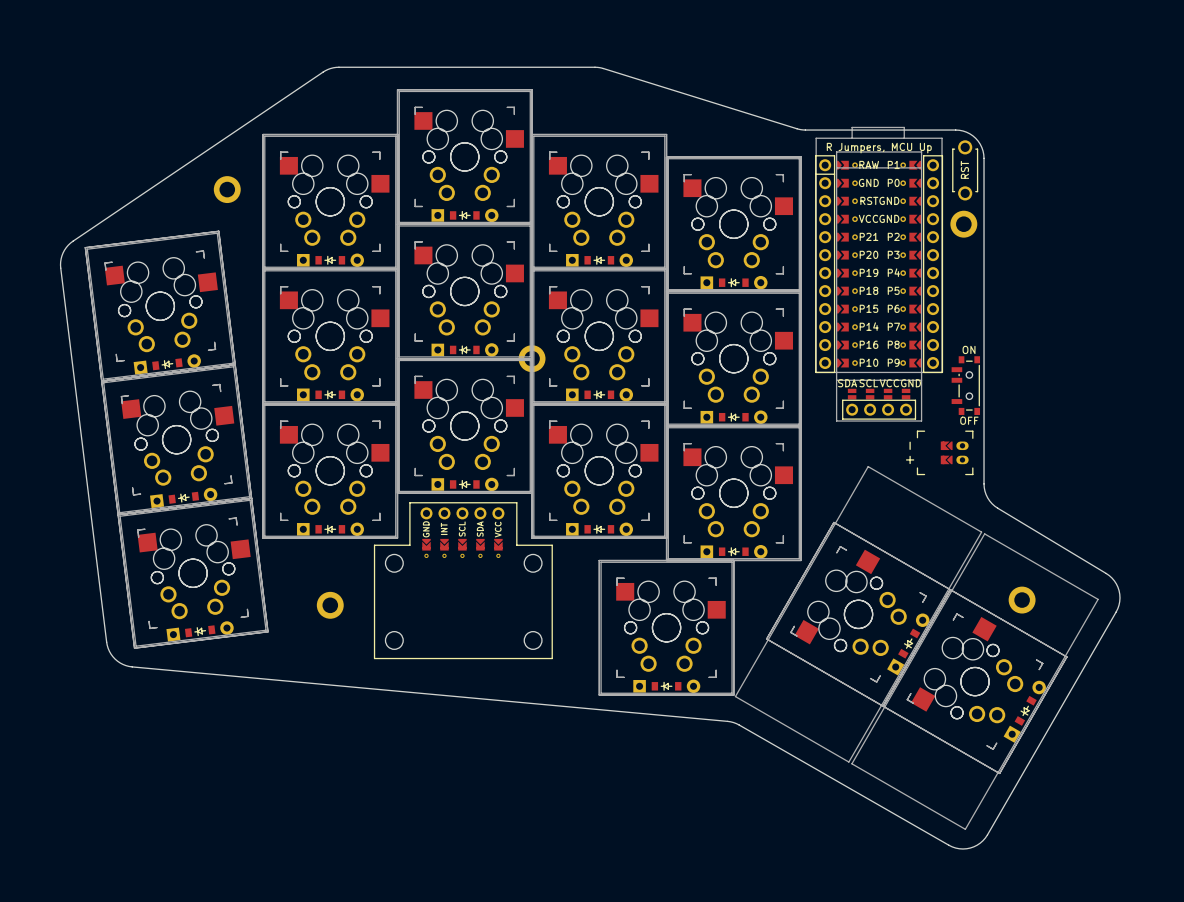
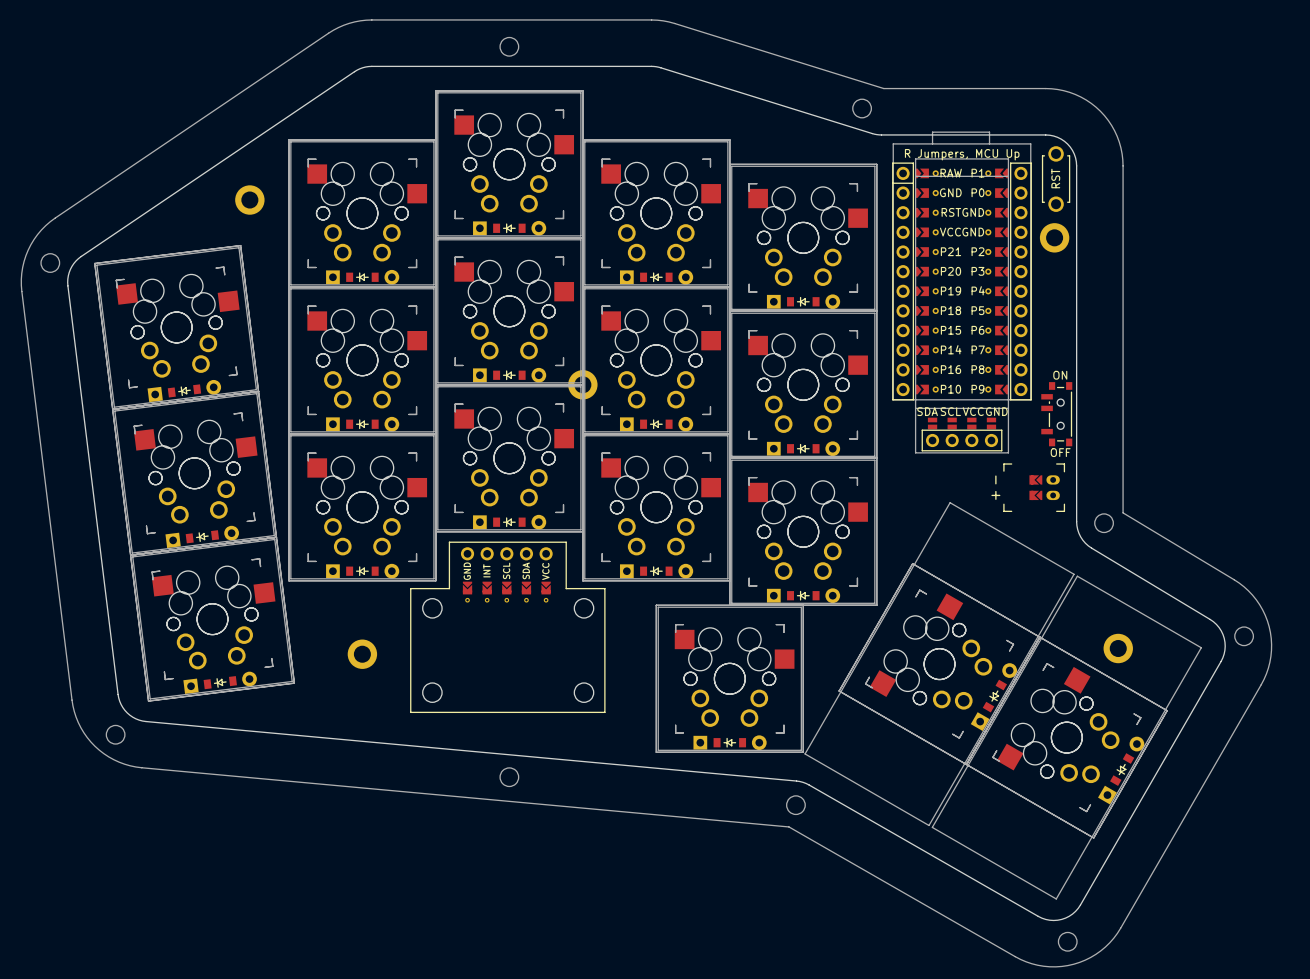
line: none -> (371, 19) (663, 20) (883, 88) (1045, 88) (1063, 90) (1091, 103) (1108, 120) (1119, 142) (1123, 165) (1123, 512) (1243, 586) (1262, 609) (1269, 626) (1271, 644) (1269, 662) (1261, 684) (1120, 928) (1100, 950) (1079, 962) (1061, 966) (1043, 966) (1026, 961) (788, 826) (141, 767) (113, 759) (99, 750) (87, 737) (78, 722) (72, 700) (21, 291) (21, 273) (25, 255) (37, 234) (55, 218) (328, 33) (349, 23) (371, 19)
drawing: none -> [499, 36, 520, 57]
drawing: none -> [852, 98, 872, 119]
drawing: none -> [40, 253, 61, 273]
drawing: none -> [1094, 513, 1114, 534]
drawing: none -> [1234, 626, 1254, 647]
drawing: none -> [105, 724, 126, 745]
drawing: none -> [499, 767, 520, 788]
drawing: none -> [786, 795, 806, 816]
drawing: none -> [1057, 931, 1078, 952]

